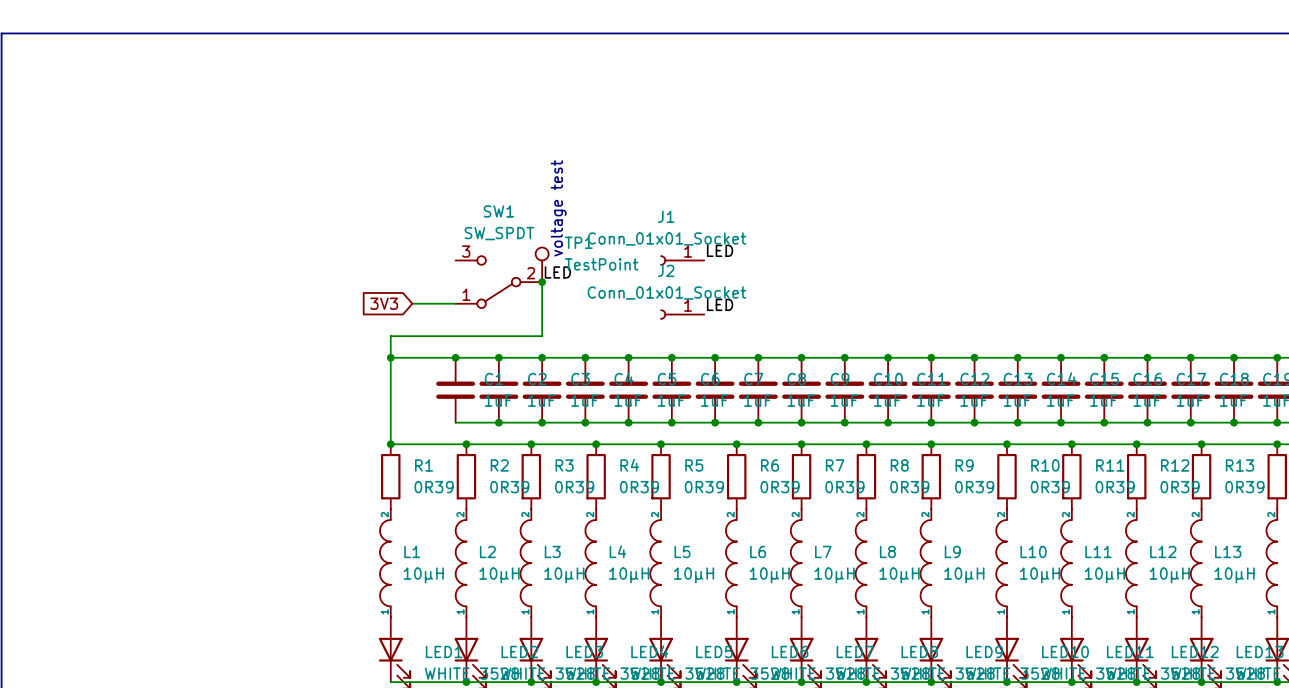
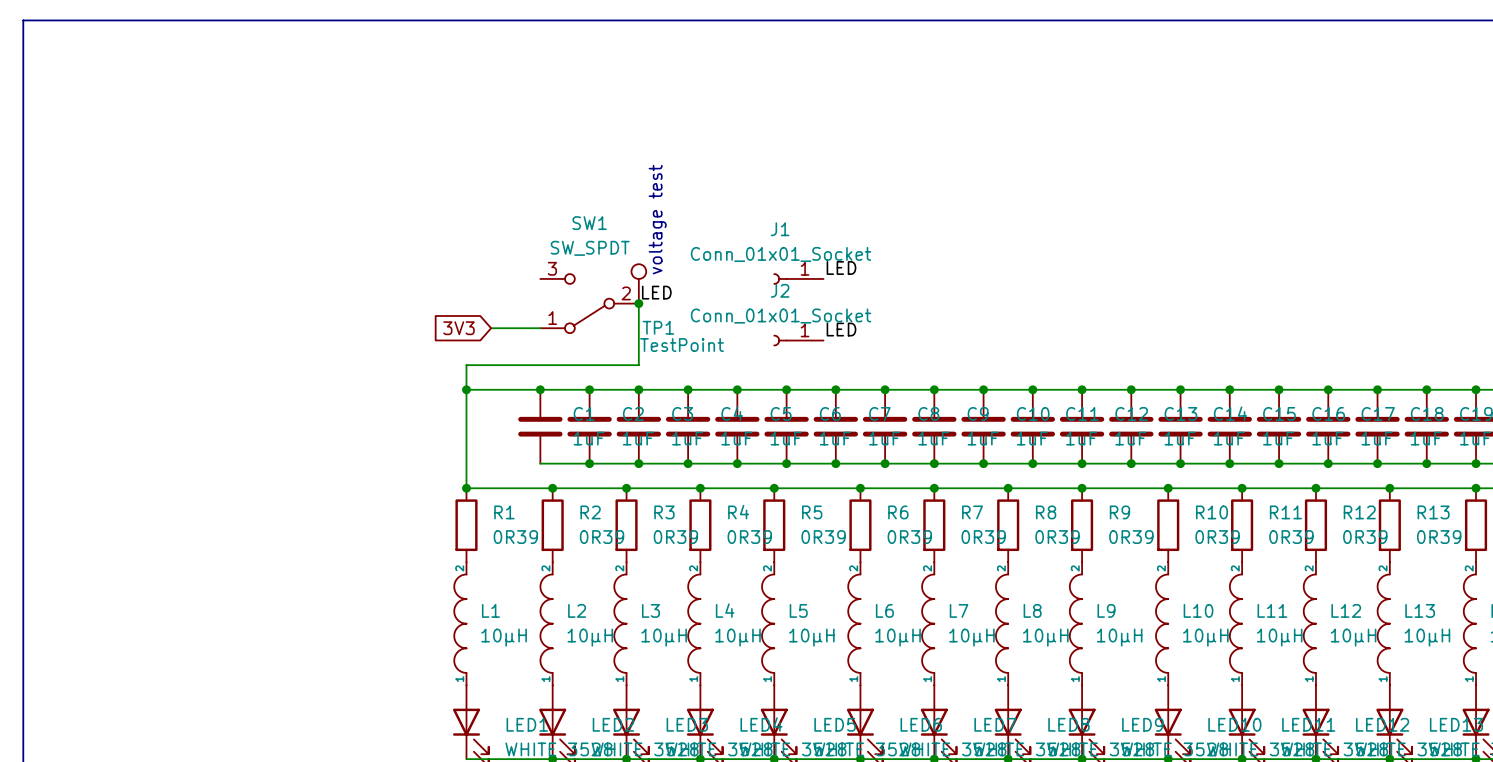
TP1 name position: TP1 (578, 242) -> TP1 (658, 327)
TP1 value position: TestPoint (601, 264) -> TestPoint (682, 345)

